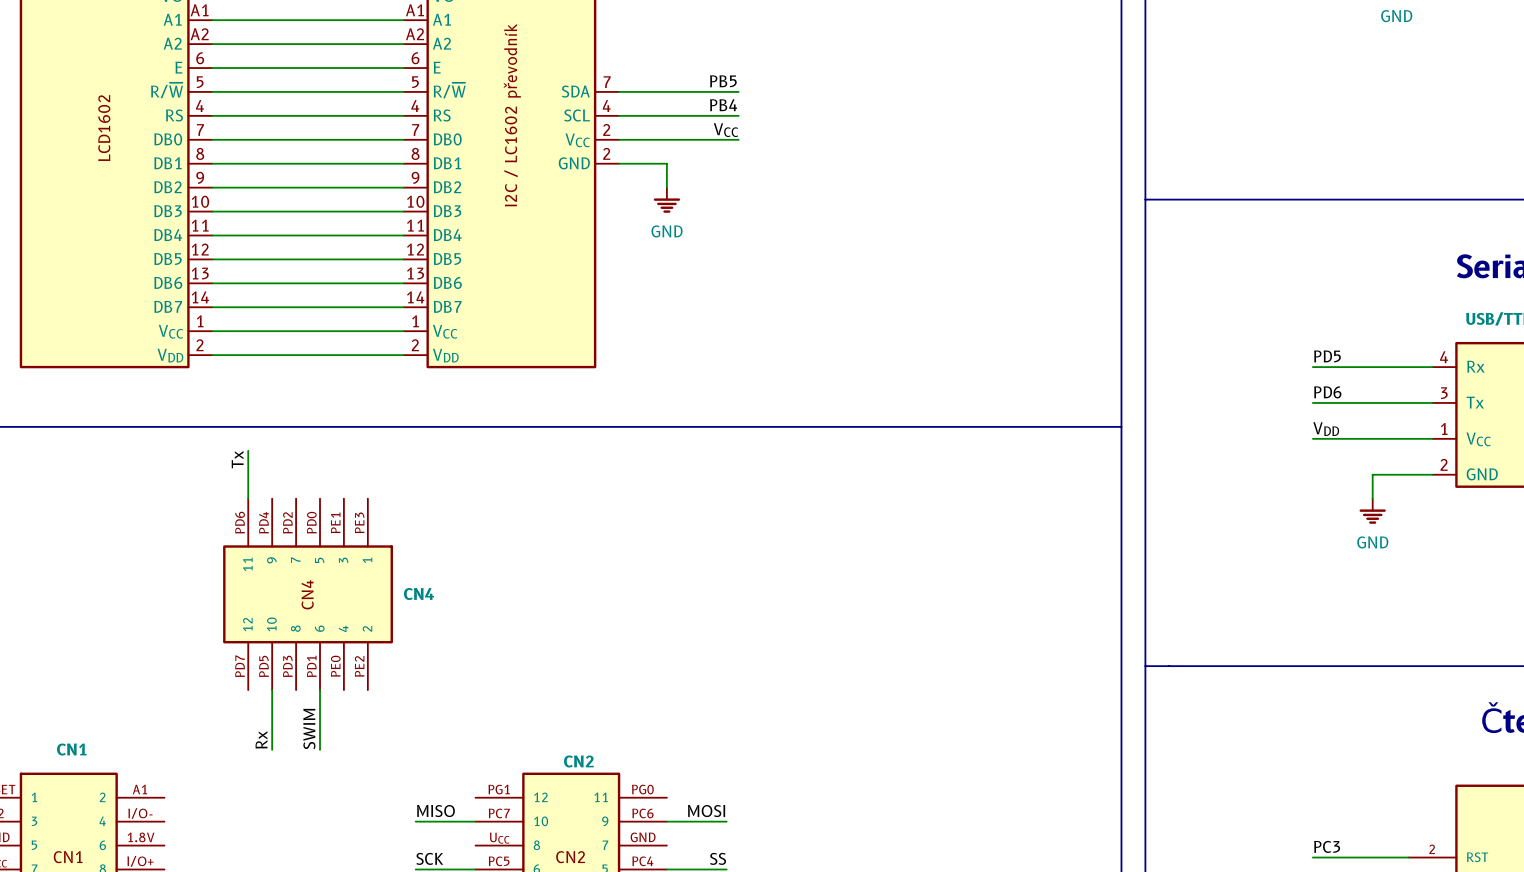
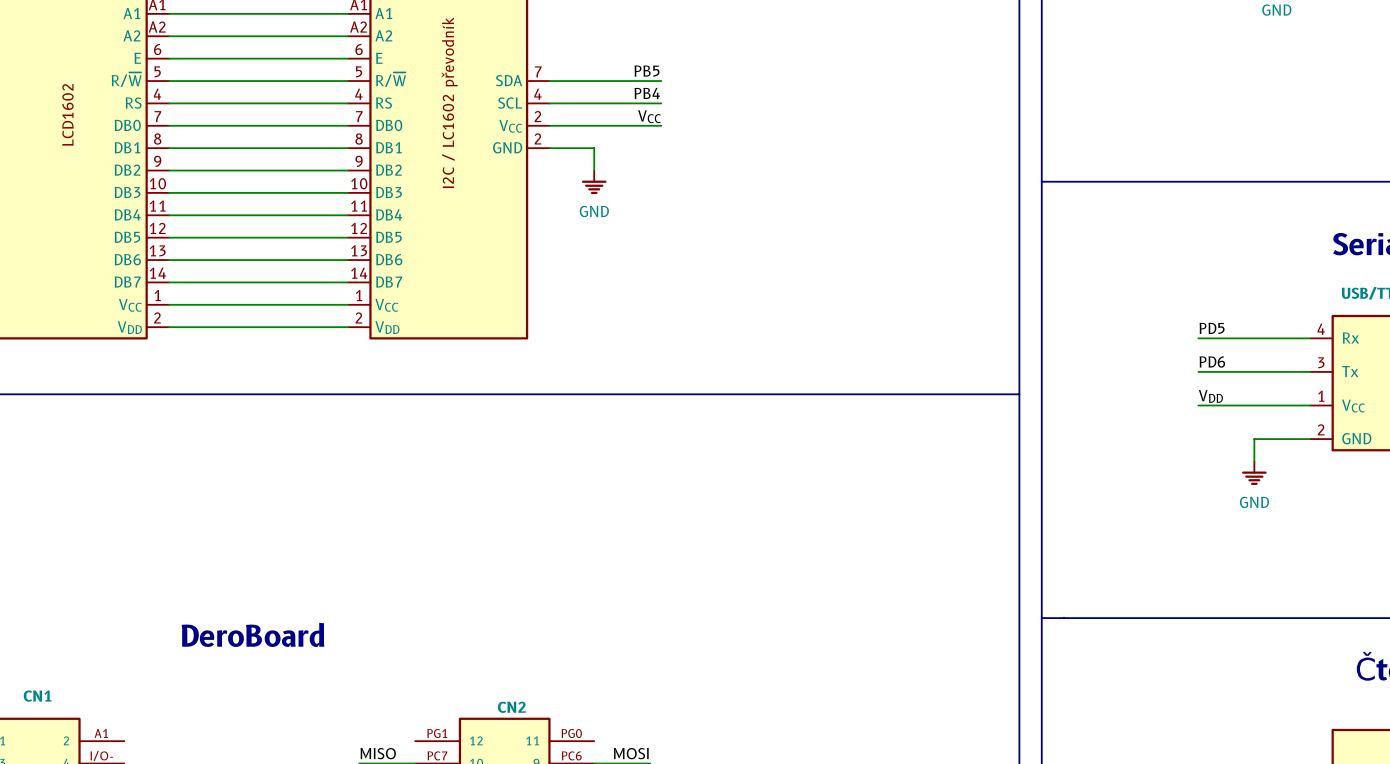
wire: (248, 450) (248, 498) -> none
label: Tx (237, 459) -> none
CN4: (308, 594) -> none
text: none -> DeroBoard (252, 634)
wire: (272, 690) (272, 749) -> none
wire: (320, 690) (320, 749) -> none
label: SWIM (309, 729) -> none
label: Rx (261, 739) -> none

